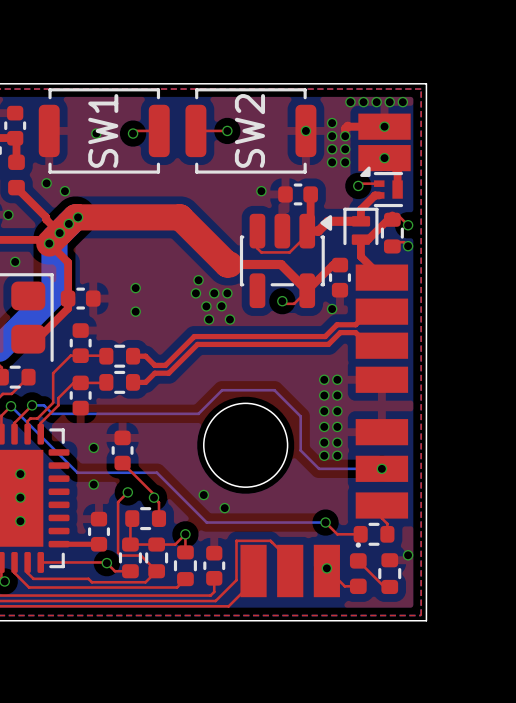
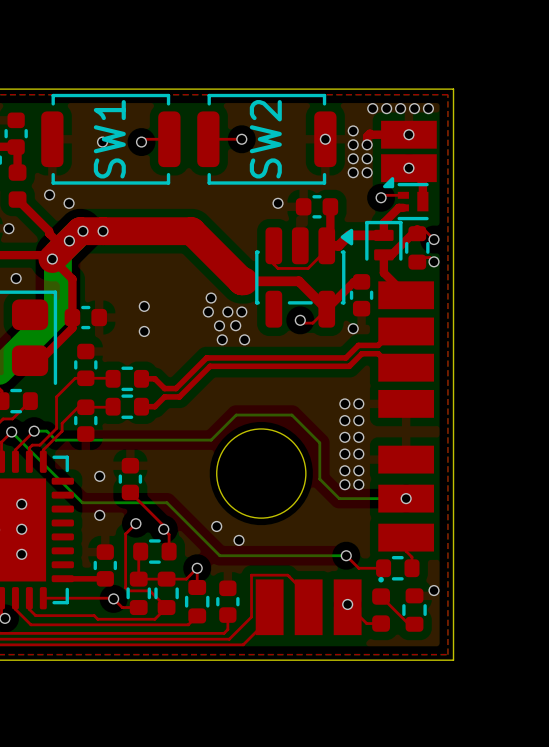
via: none -> (103, 231)
via: (68, 223) -> none
via: none -> (69, 240)
via: (59, 233) -> none

